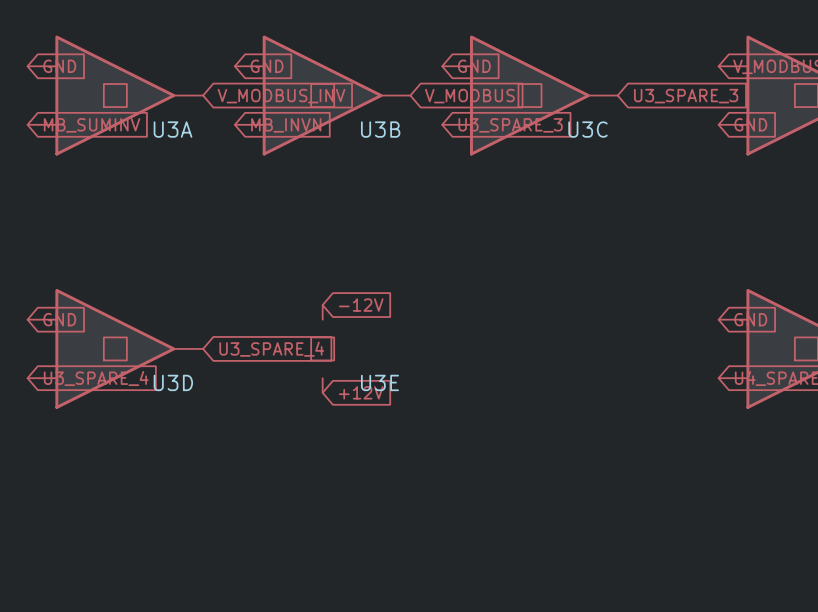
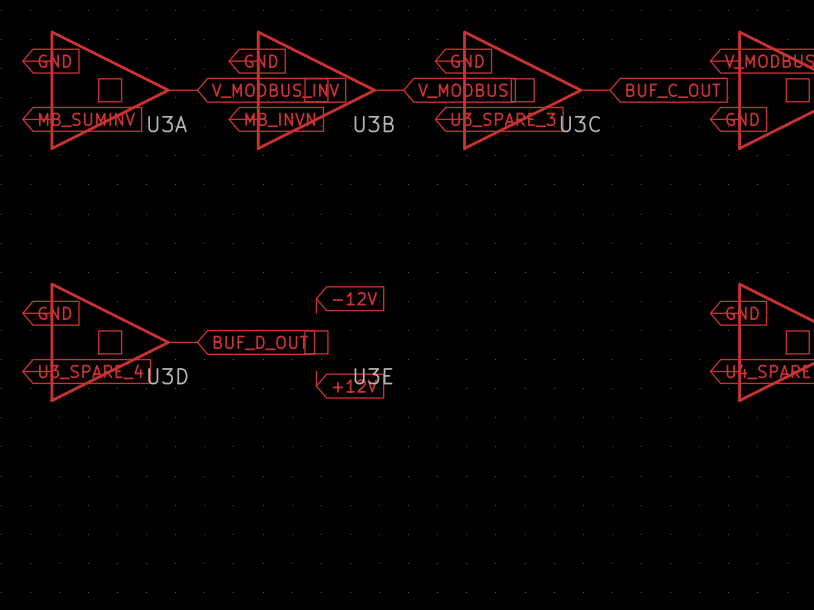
global label: U3_SPARE_3 (686, 96) -> BUF_C_OUT (673, 90)
global label: U3_SPARE_4 (271, 349) -> BUF_D_OUT (260, 342)

